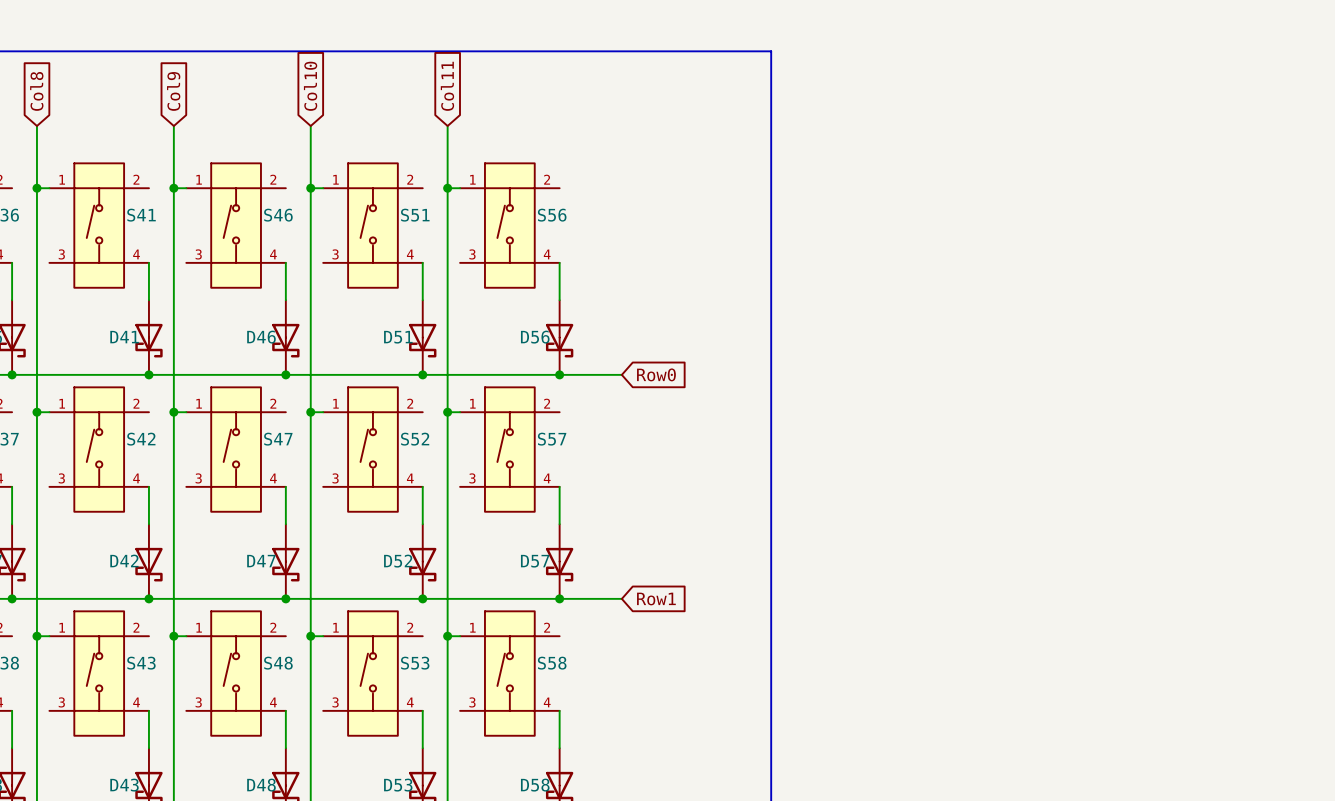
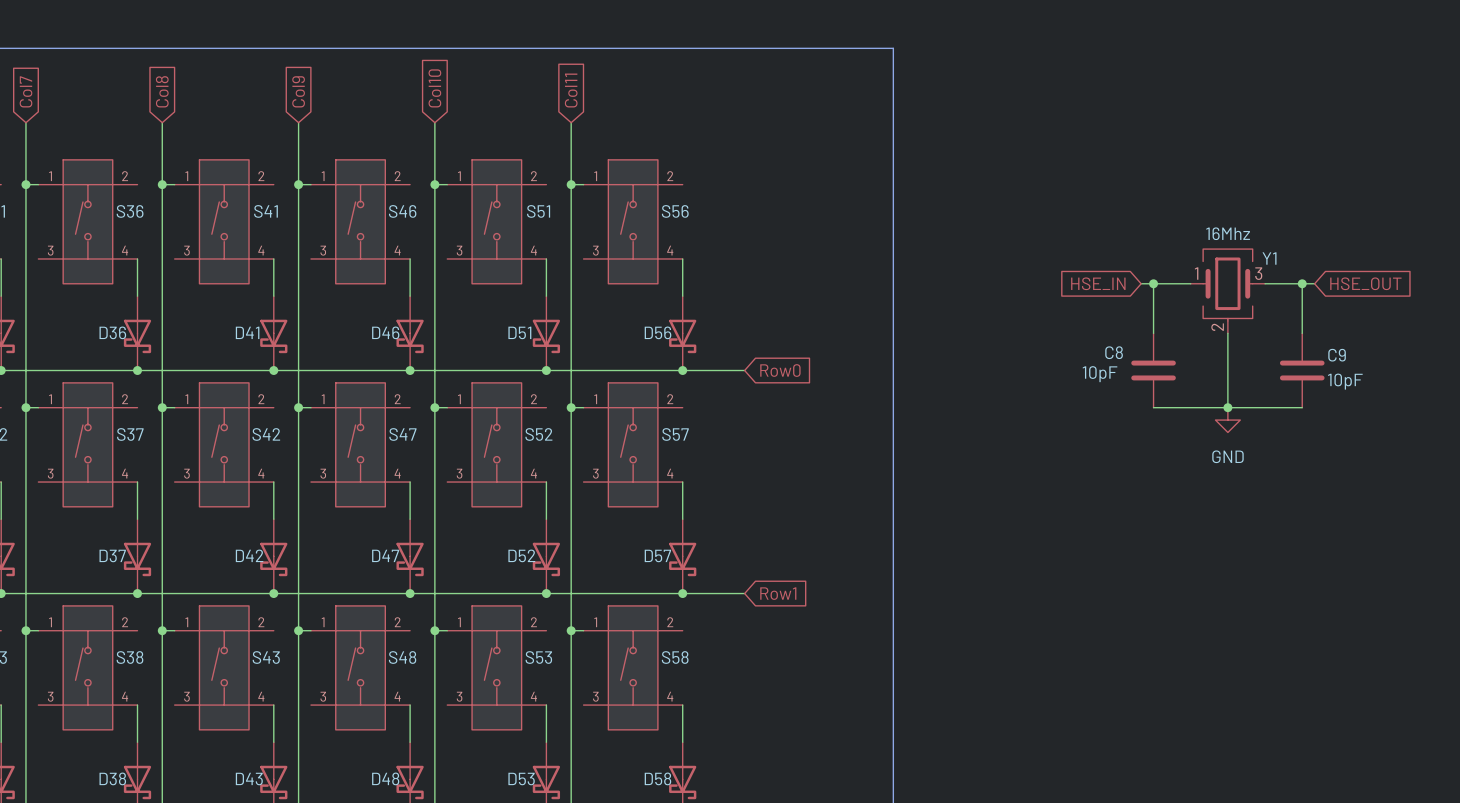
wire: none -> (1141, 283) (1190, 283)
wire: none -> (1153, 283) (1153, 333)
junction: none -> (1153, 283)
wire: none -> (1265, 283) (1314, 283)
wire: none -> (1302, 283) (1302, 333)
junction: none -> (1302, 283)
global label: none -> HSE_IN (1098, 283)
global label: none -> HSE_OUT (1365, 283)
Y1: none -> 16Mhz (1227, 291)
wire: none -> (1227, 333) (1227, 407)
C8: none -> 10pF (1153, 370)
C9: none -> 10pF (1302, 370)
wire: none -> (1153, 407) (1302, 407)
junction: none -> (1227, 407)
power symbol: none -> GND (1227, 420)

